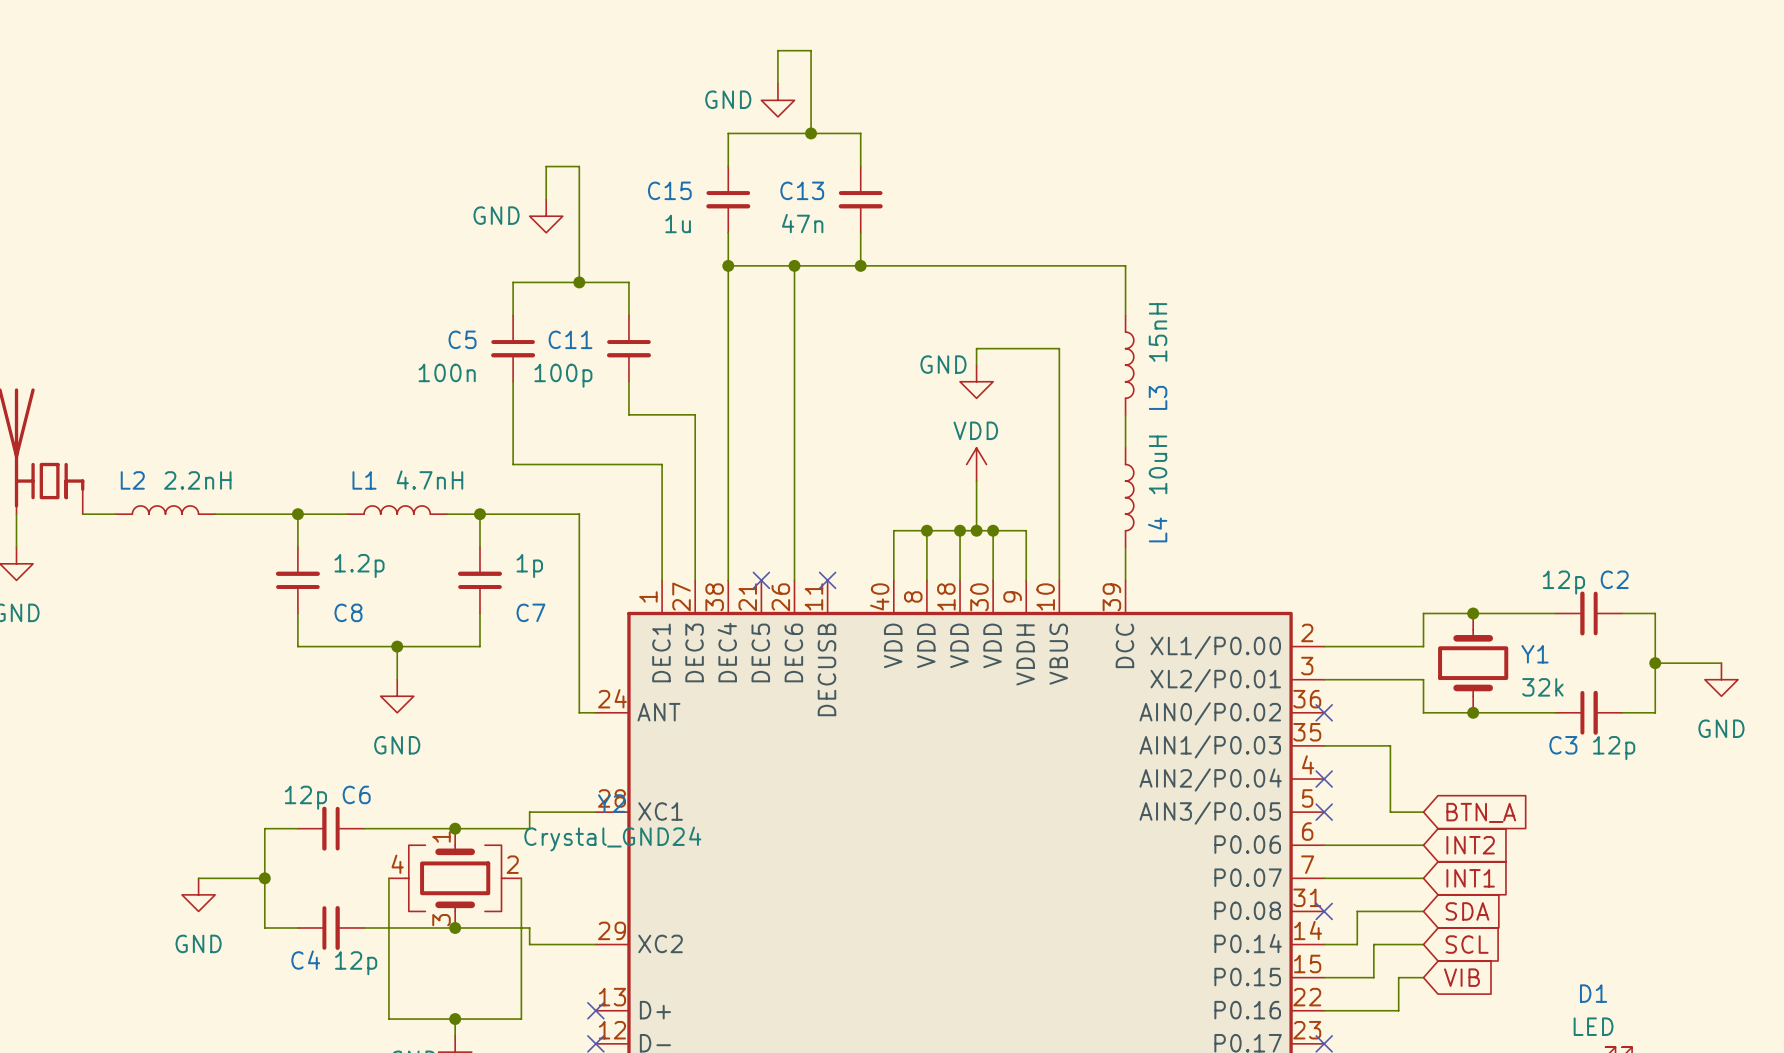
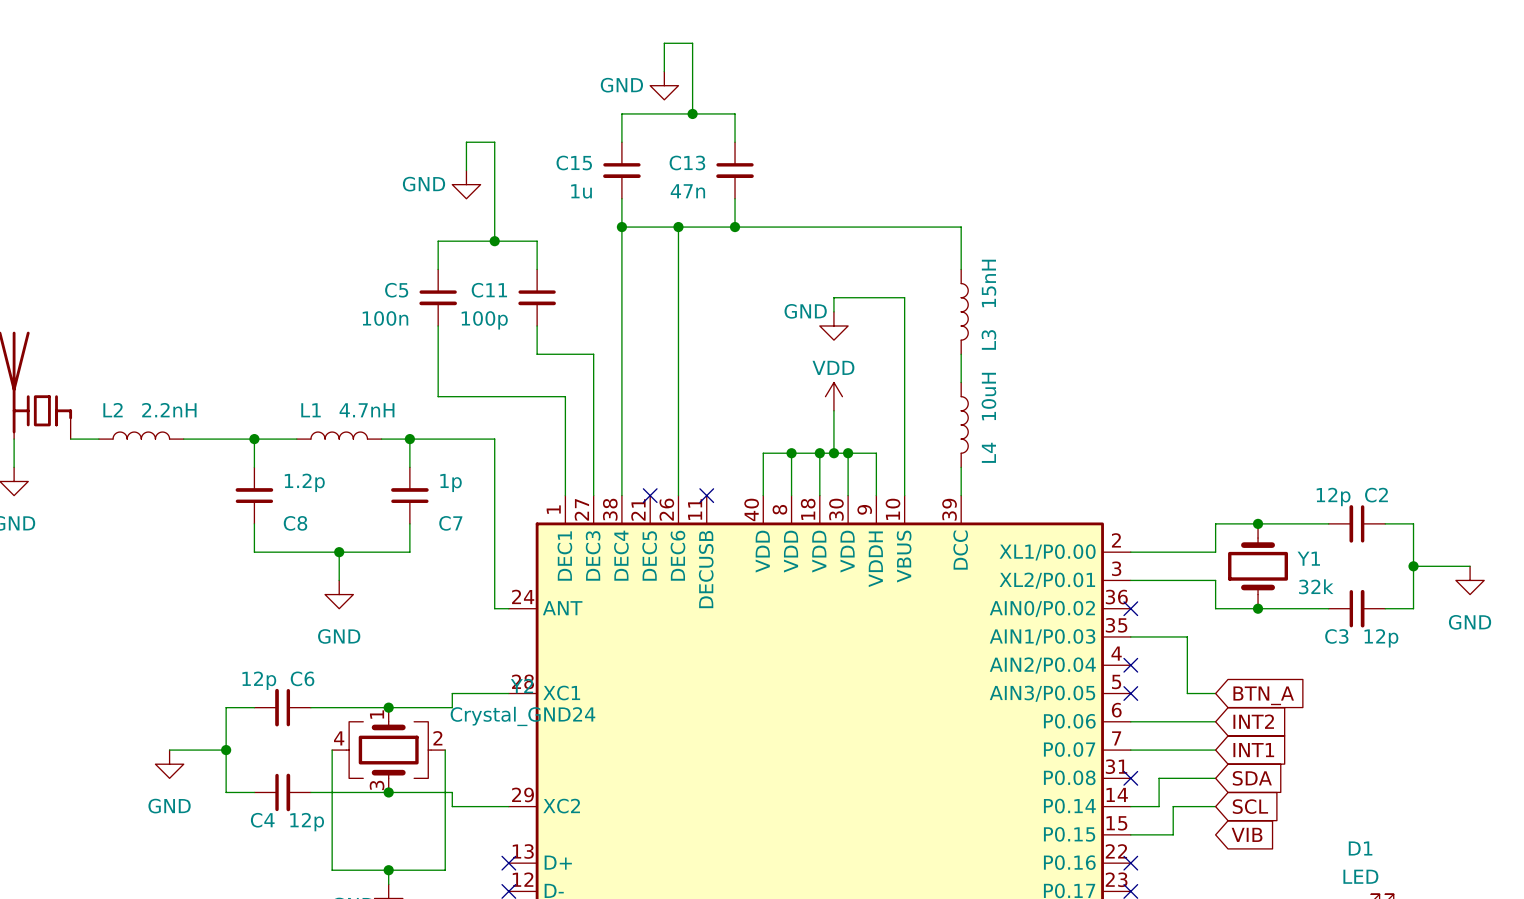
wire: (1423, 977) (1398, 977) (1398, 1010) (1324, 1010) -> none
no-connect mark: none -> (1130, 863)

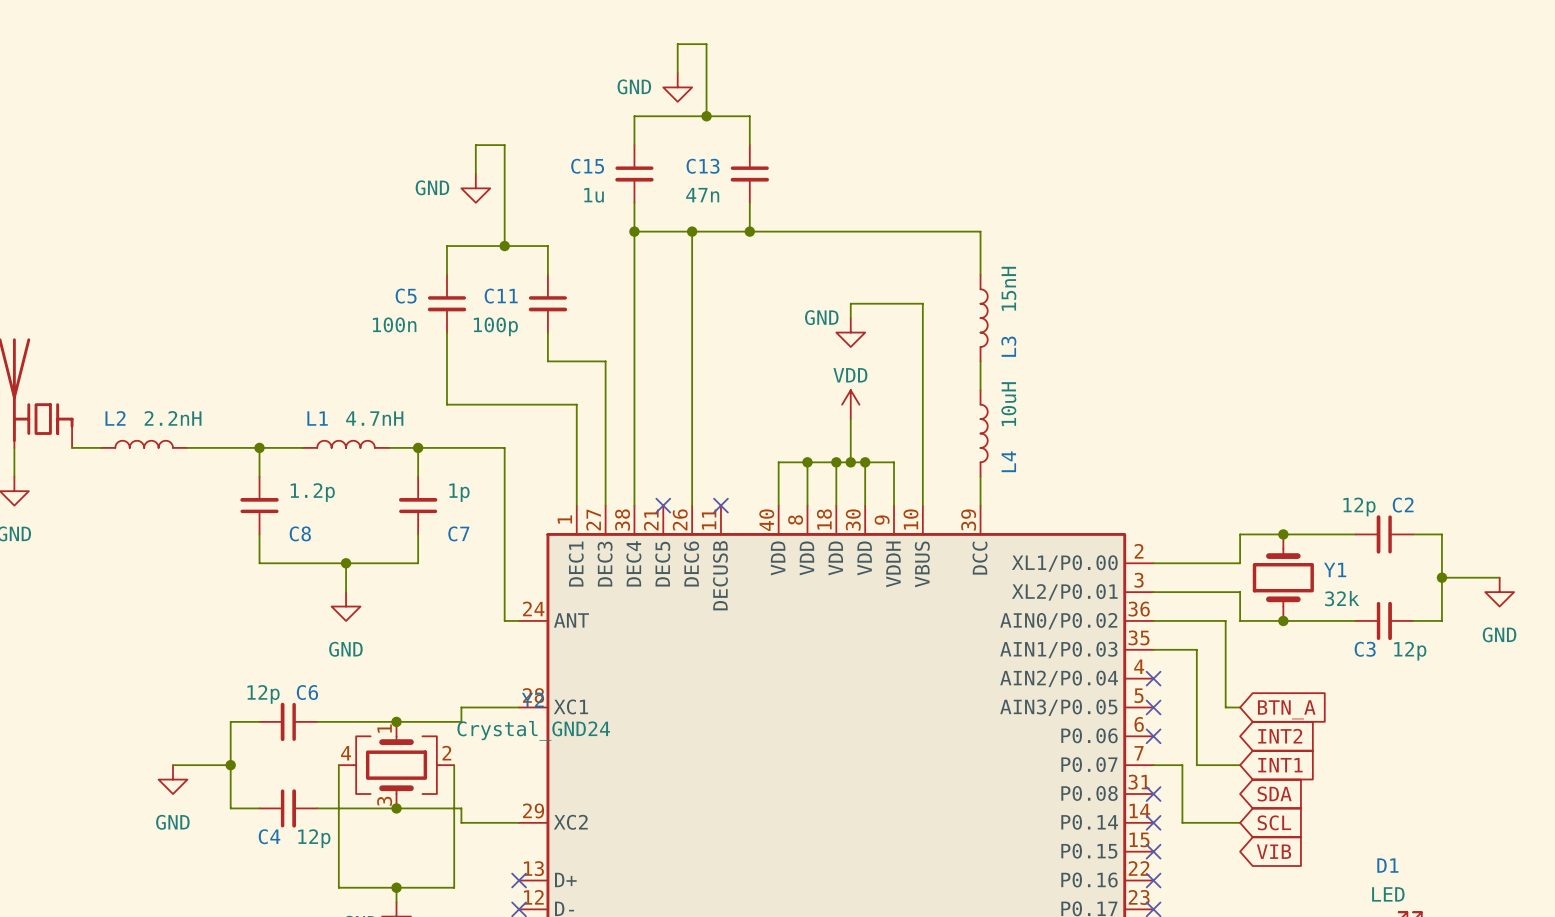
no-connect mark: (1130, 608) -> none
wire: (1173, 636) (1187, 636) (1187, 693) (1201, 693) -> (1153, 620) (1225, 620) (1225, 707)
wire: none -> (1196, 649) (1196, 765)
wire: (1130, 721) (1215, 721) -> none
no-connect mark: none -> (1153, 736)
wire: (1159, 750) (1173, 750) -> (1182, 765) (1182, 794)
wire: (1159, 778) (1215, 778) -> none
wire: (1130, 806) (1159, 806) -> none
no-connect mark: none -> (1153, 822)
wire: (1173, 806) (1173, 834) (1130, 834) -> (1196, 822) (1182, 822)
no-connect mark: none -> (1153, 851)

